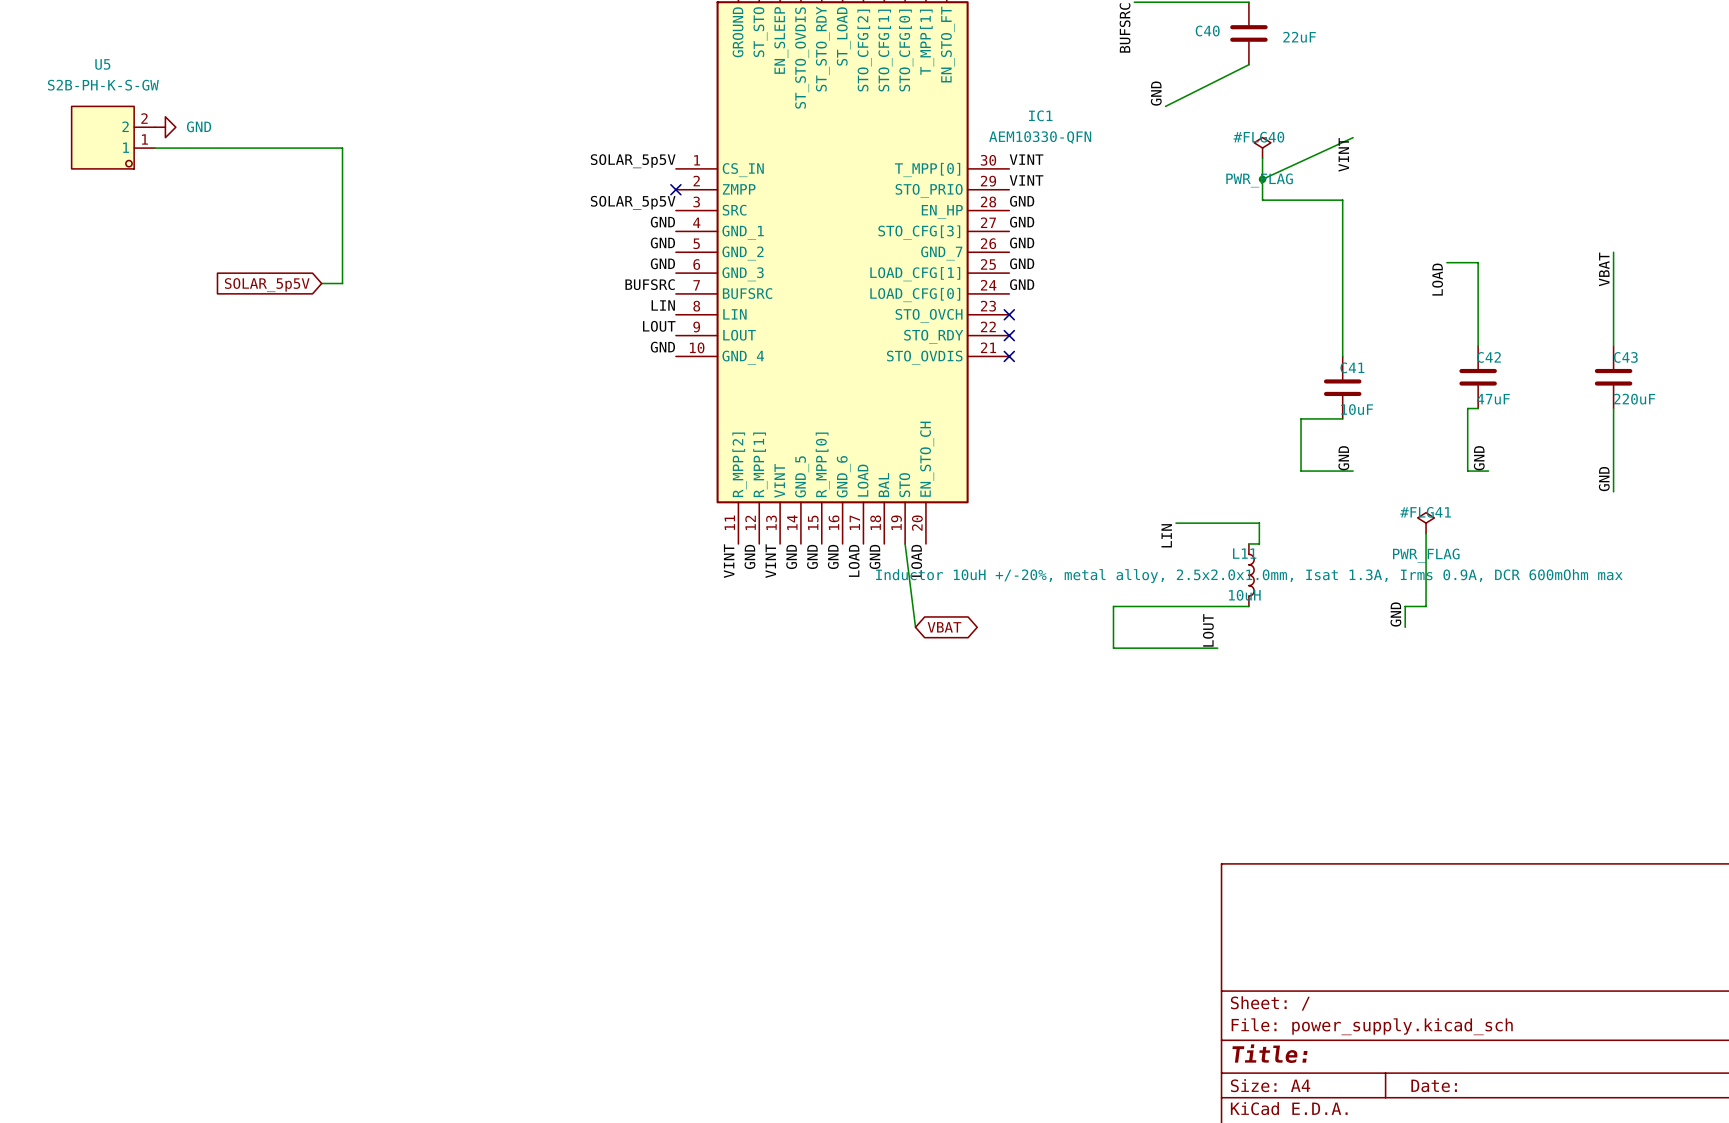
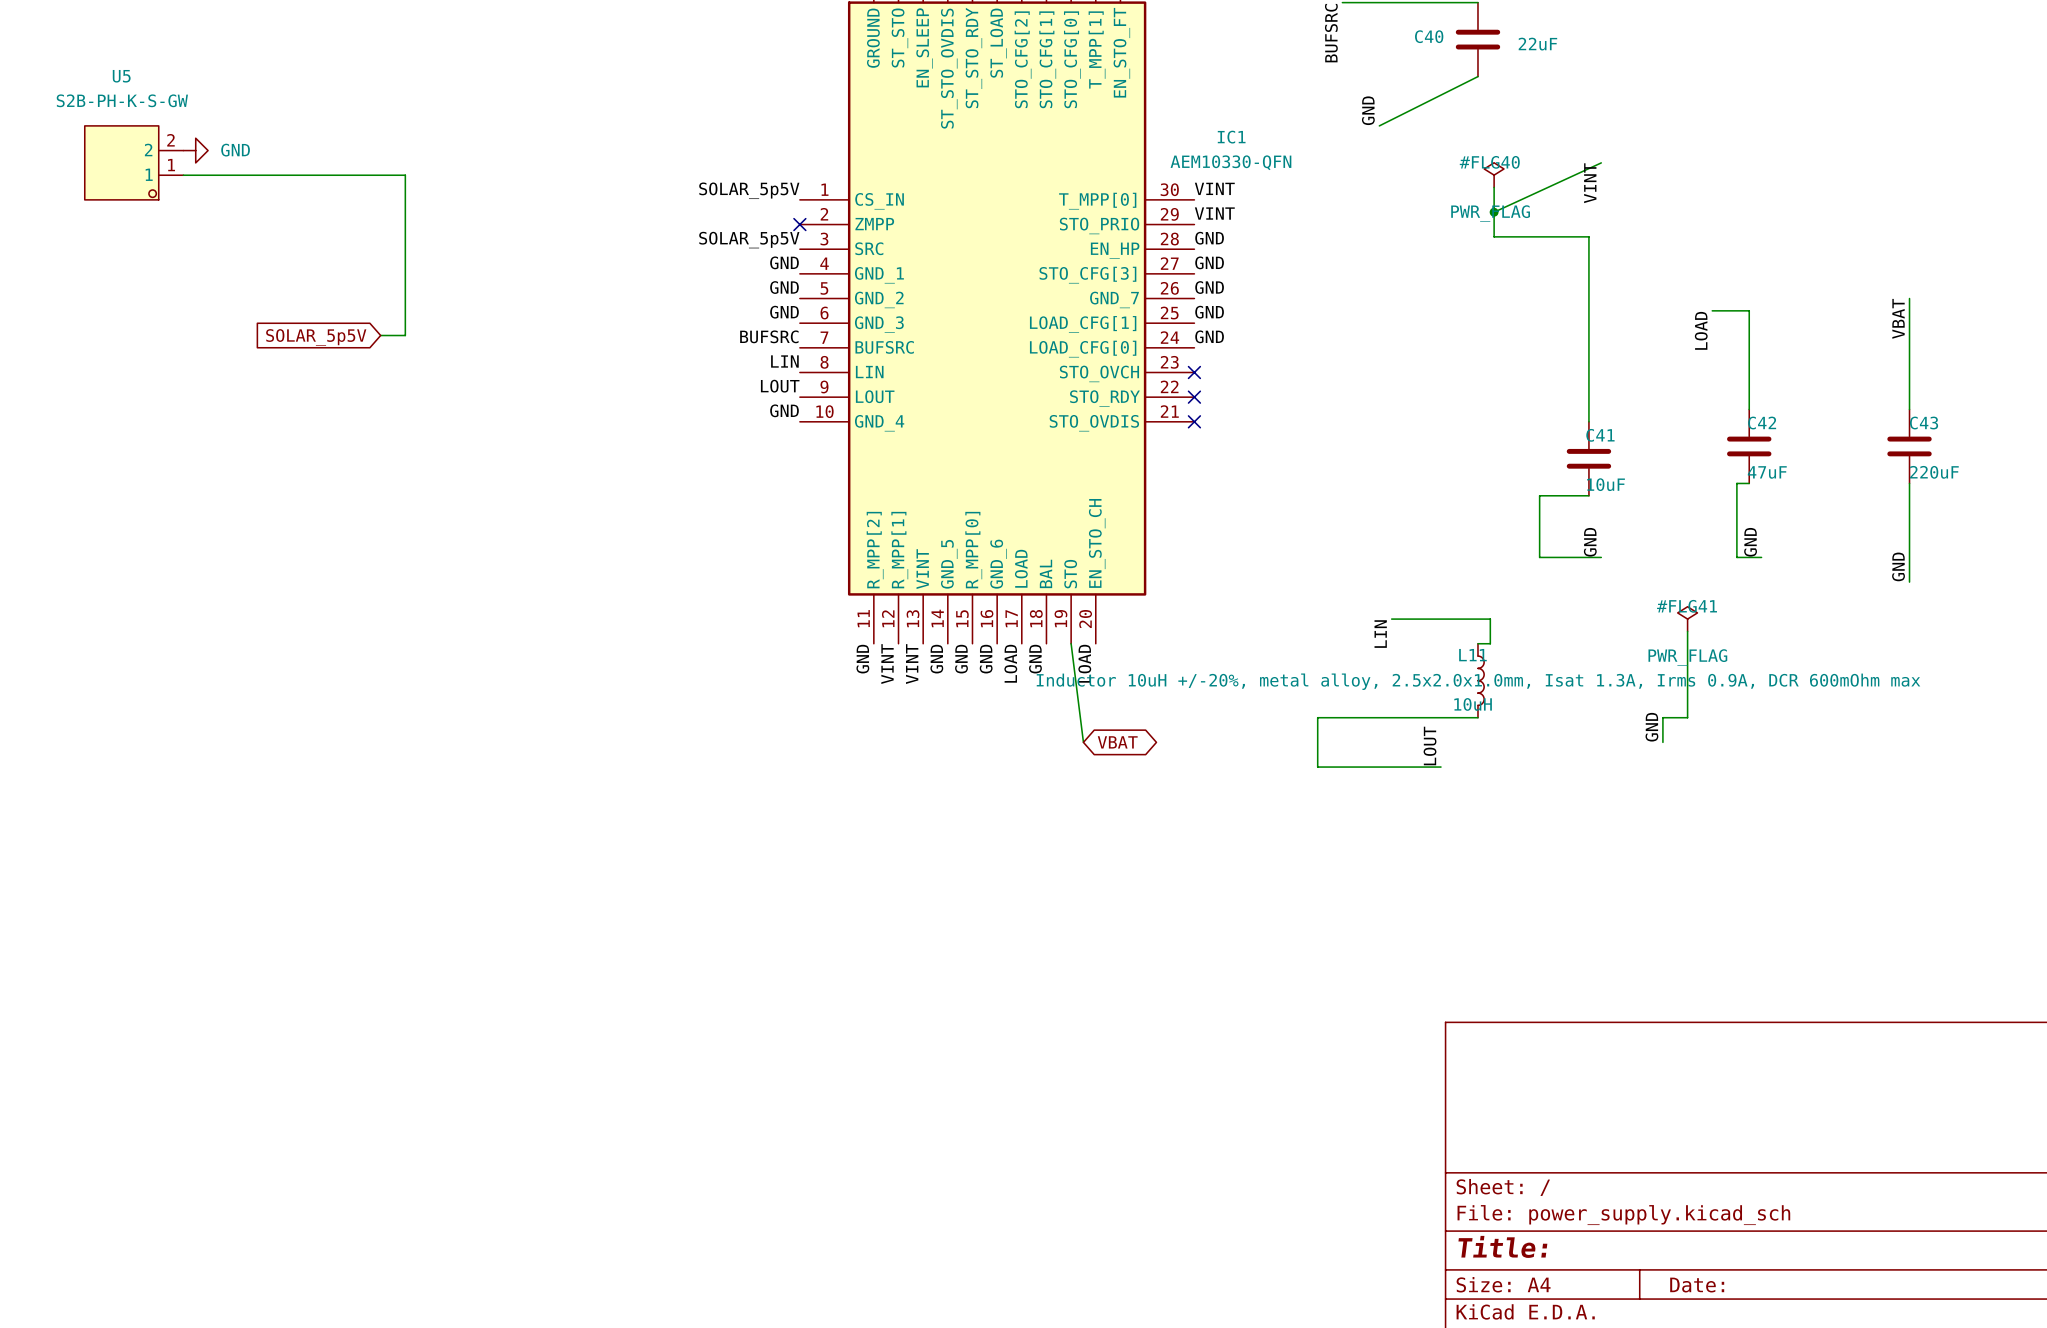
label: GND (749, 556) -> VINT (887, 664)
label: VINT (729, 561) -> GND (862, 659)

